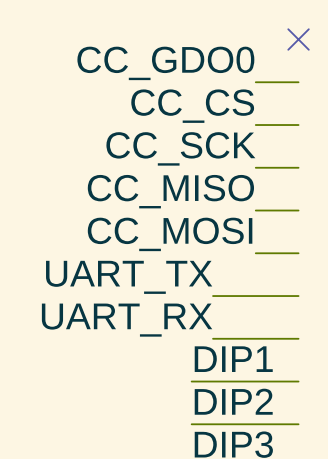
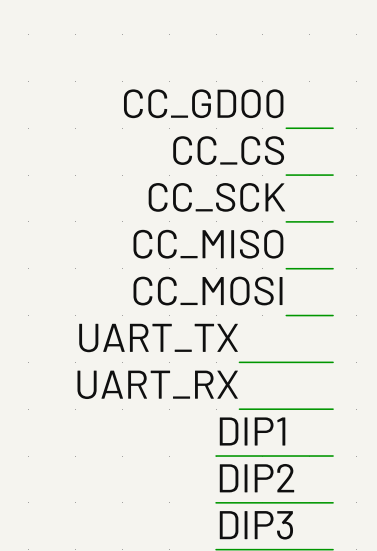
no-connect mark: (298, 39) -> none

